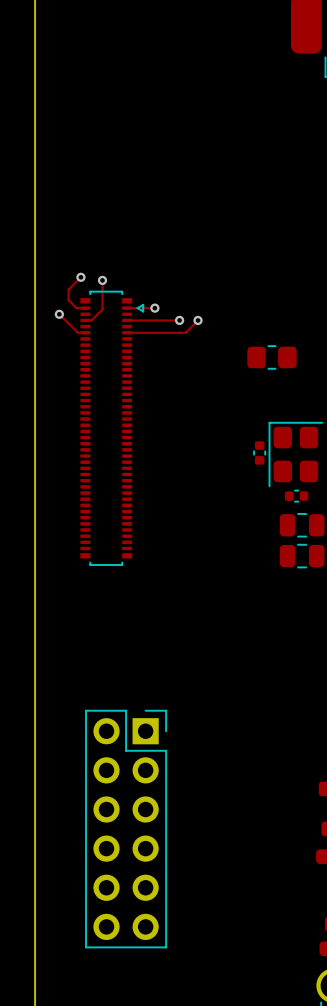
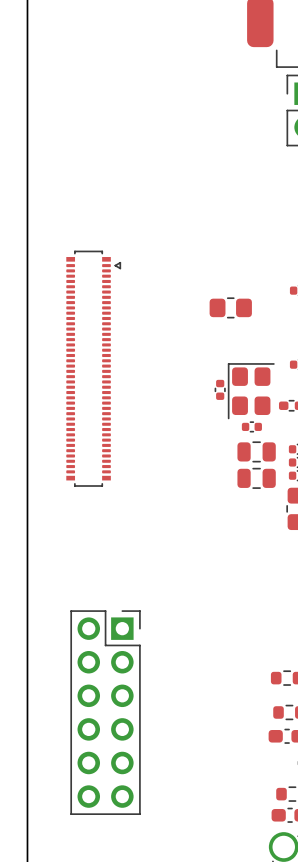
top track: (80, 277) (68, 289) (68, 300) (76, 308) (85, 308) -> none
via: (80, 277) -> none
top track: (102, 280) (102, 309) (91, 320) (85, 320) -> none
via: (102, 280) -> none
top track: (127, 308) (154, 308) -> none
via: (154, 308) -> none
top track: (59, 314) (77, 332) (85, 332) -> none
via: (59, 314) -> none
top track: (127, 320) (179, 320) -> none
via: (179, 320) -> none
top track: (198, 320) (185, 332) (127, 332) -> none
via: (198, 320) -> none

